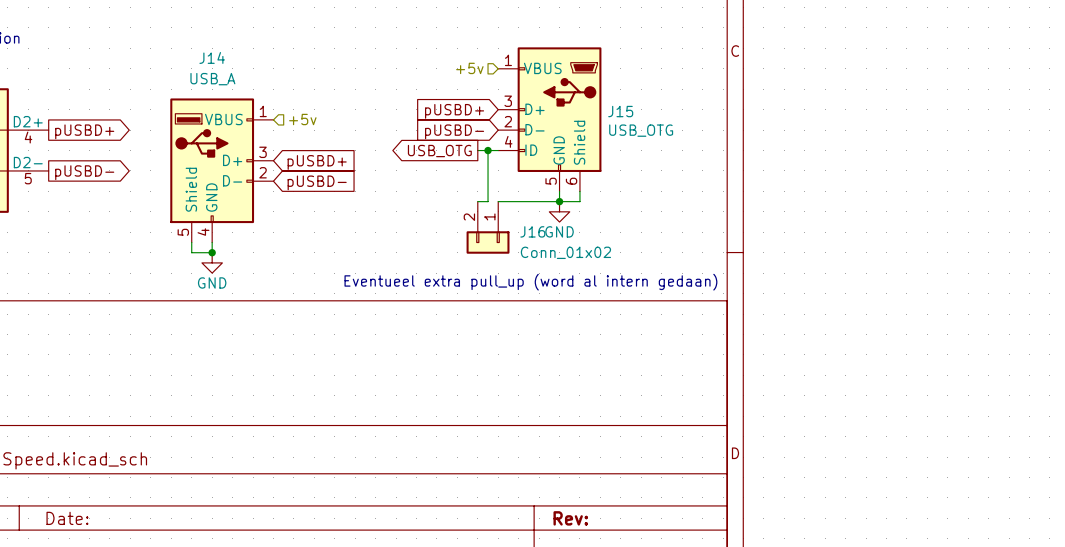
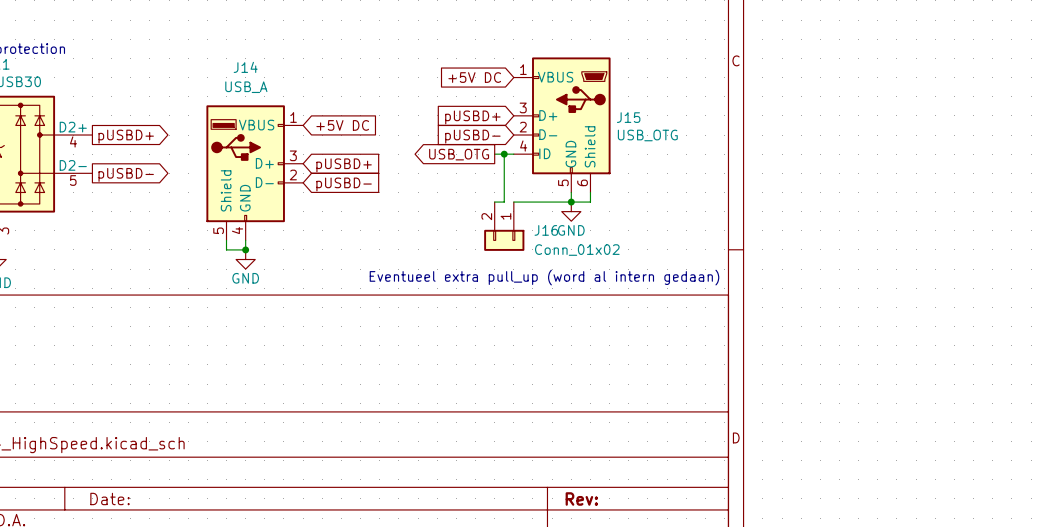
global label: none -> +5V DC (474, 77)
hierarchical label: +5v (469, 68) -> none
hierarchical label: +5v (302, 119) -> none
global label: none -> +5V DC (342, 125)

